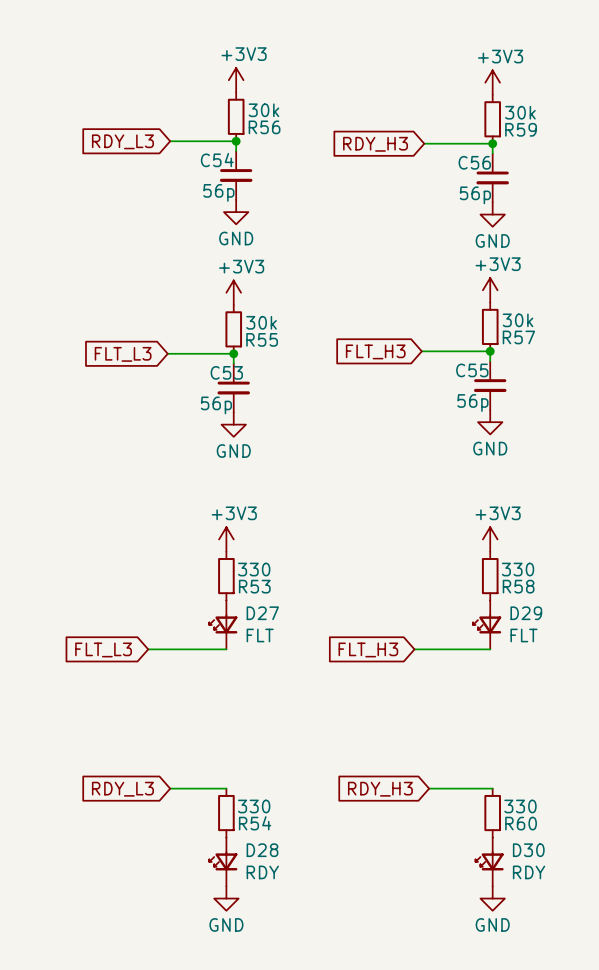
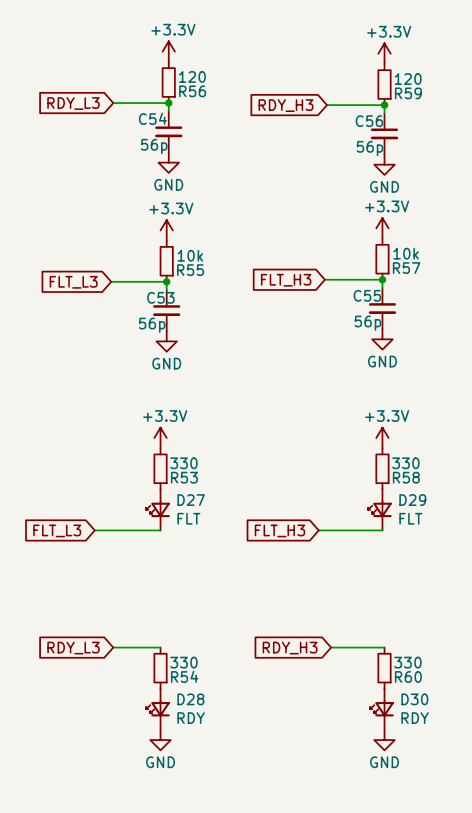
power symbol: +3V3 (236, 80) -> +3.3V (168, 51)
power symbol: +3V3 (492, 82) -> +3.3V (384, 53)
R56 value: 30k (263, 110) -> 120 (192, 76)
R59 value: 30k (520, 112) -> 120 (408, 79)
power symbol: +3V3 (490, 290) -> +3.3V (382, 228)
power symbol: +3V3 (233, 292) -> +3.3V (166, 230)
R57 value: 30k (518, 320) -> 10k (406, 253)
R55 value: 30k (261, 322) -> 10k (190, 255)
power symbol: +3V3 (226, 539) -> +3.3V (160, 437)
power symbol: +3V3 (490, 539) -> +3.3V (382, 437)

